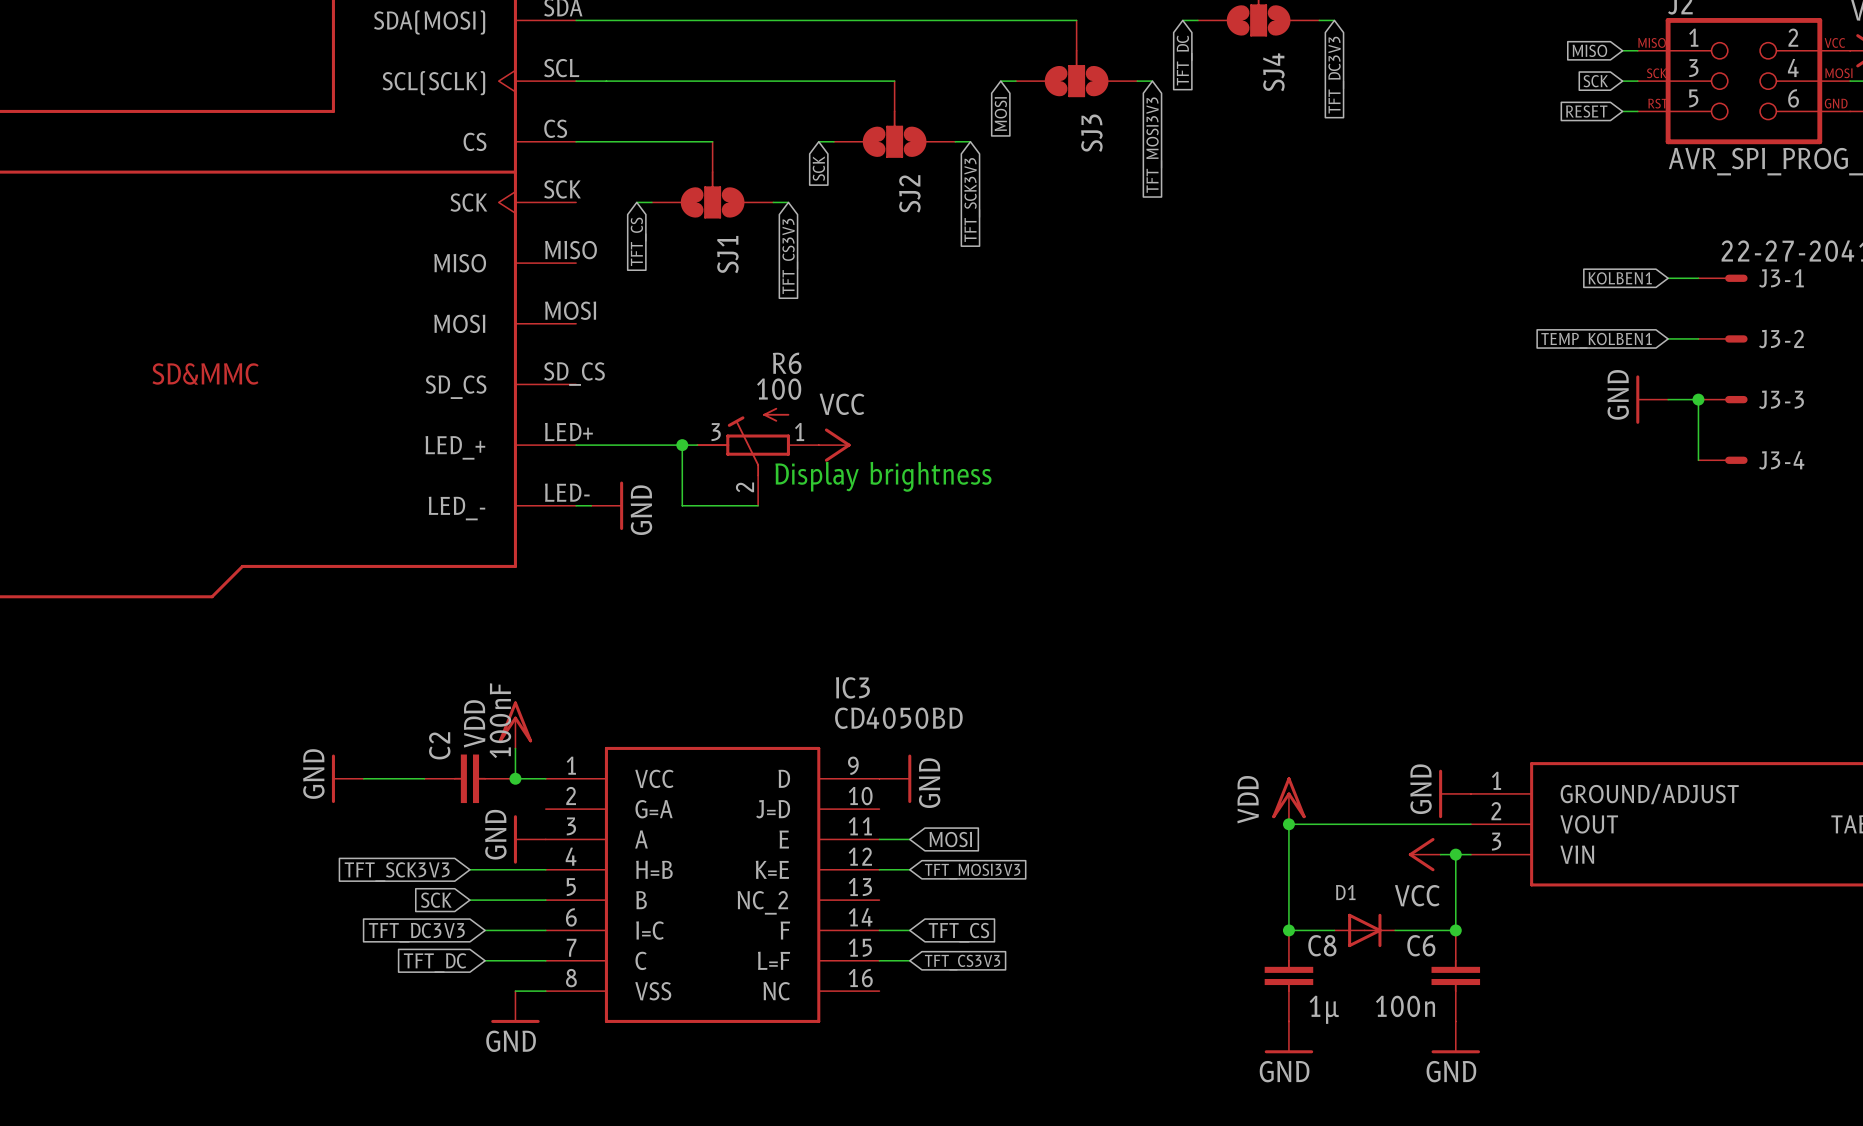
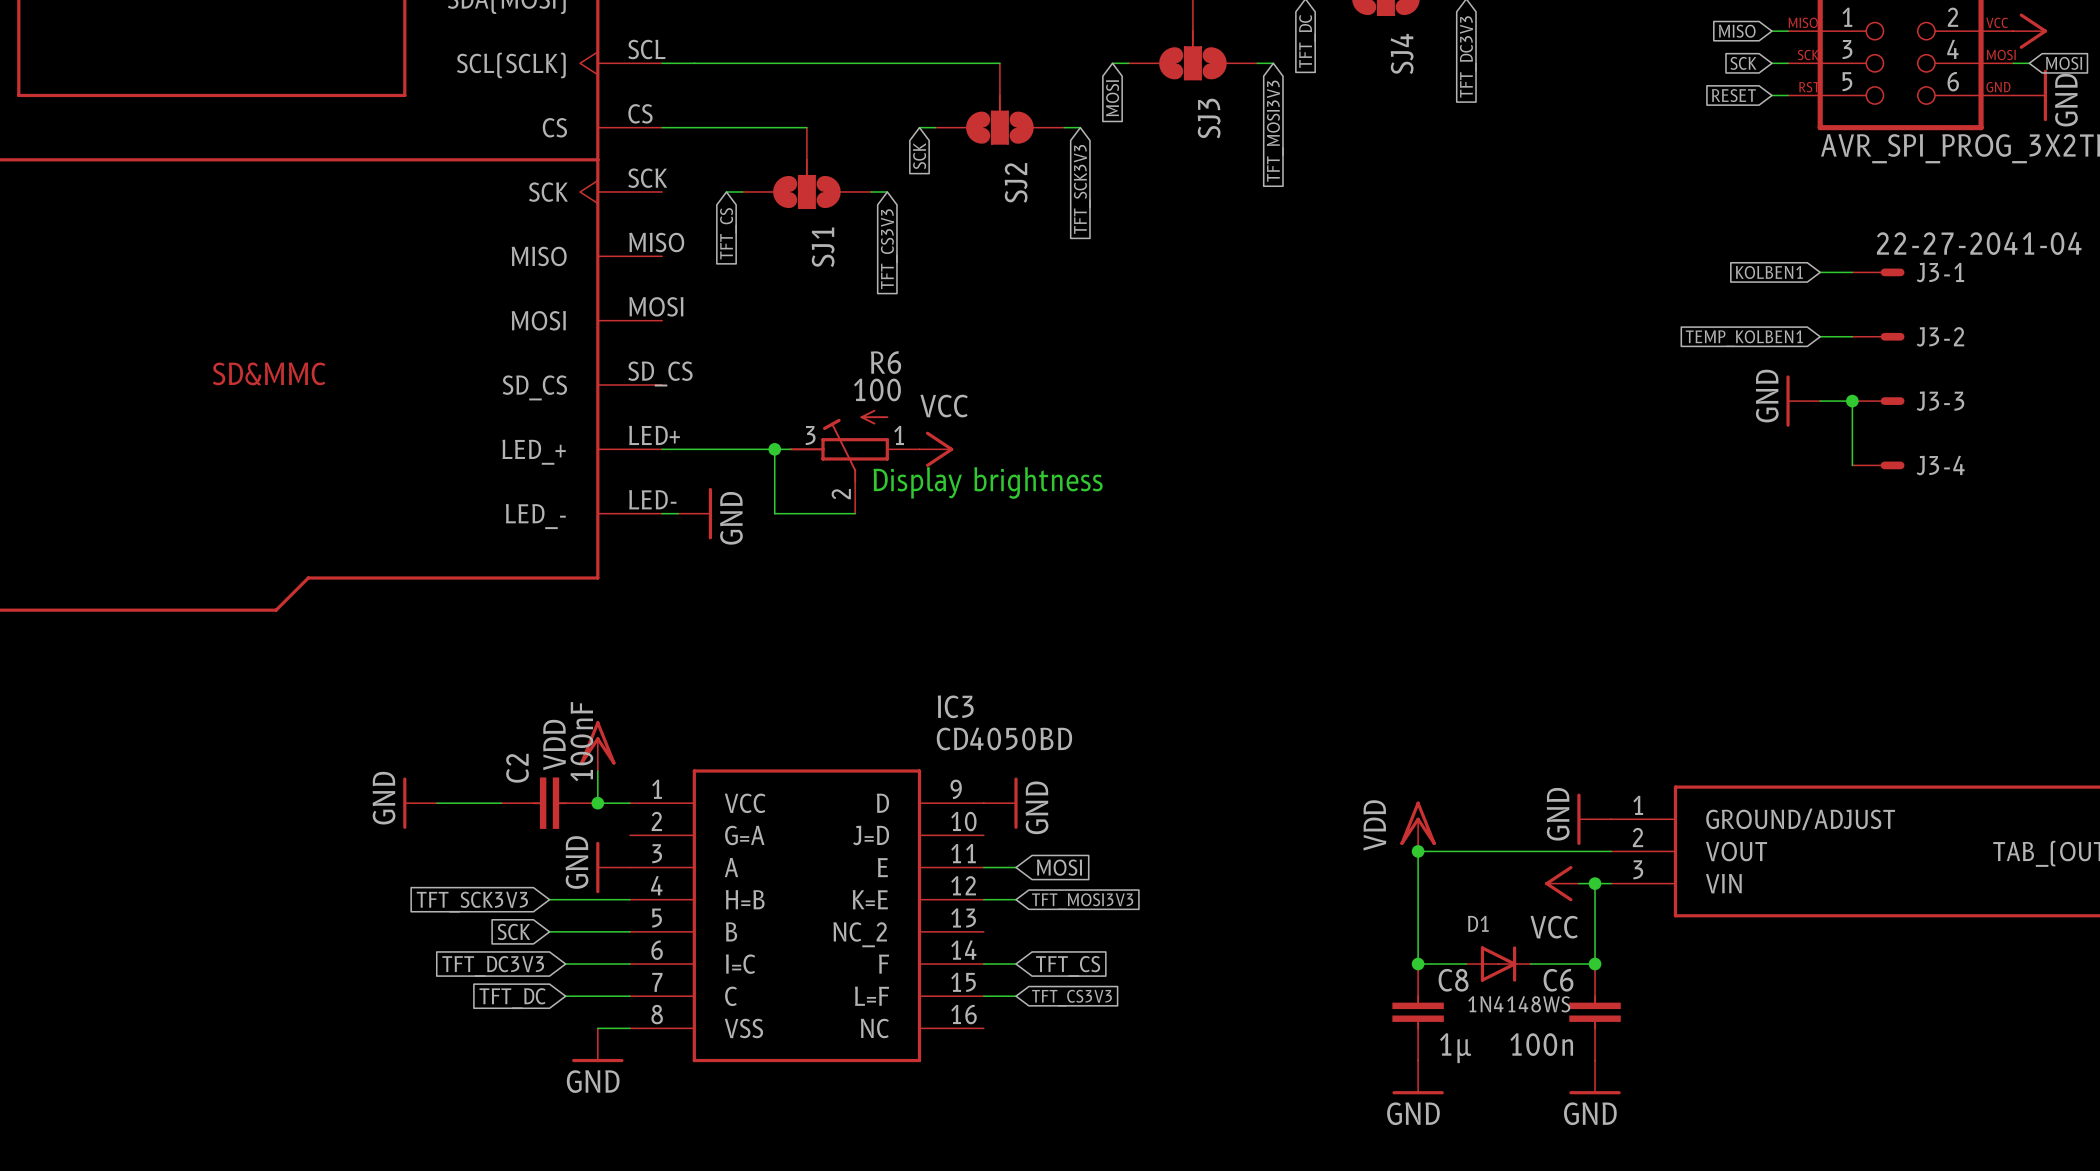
D1 value: none -> 1N4148WS (1519, 1004)

